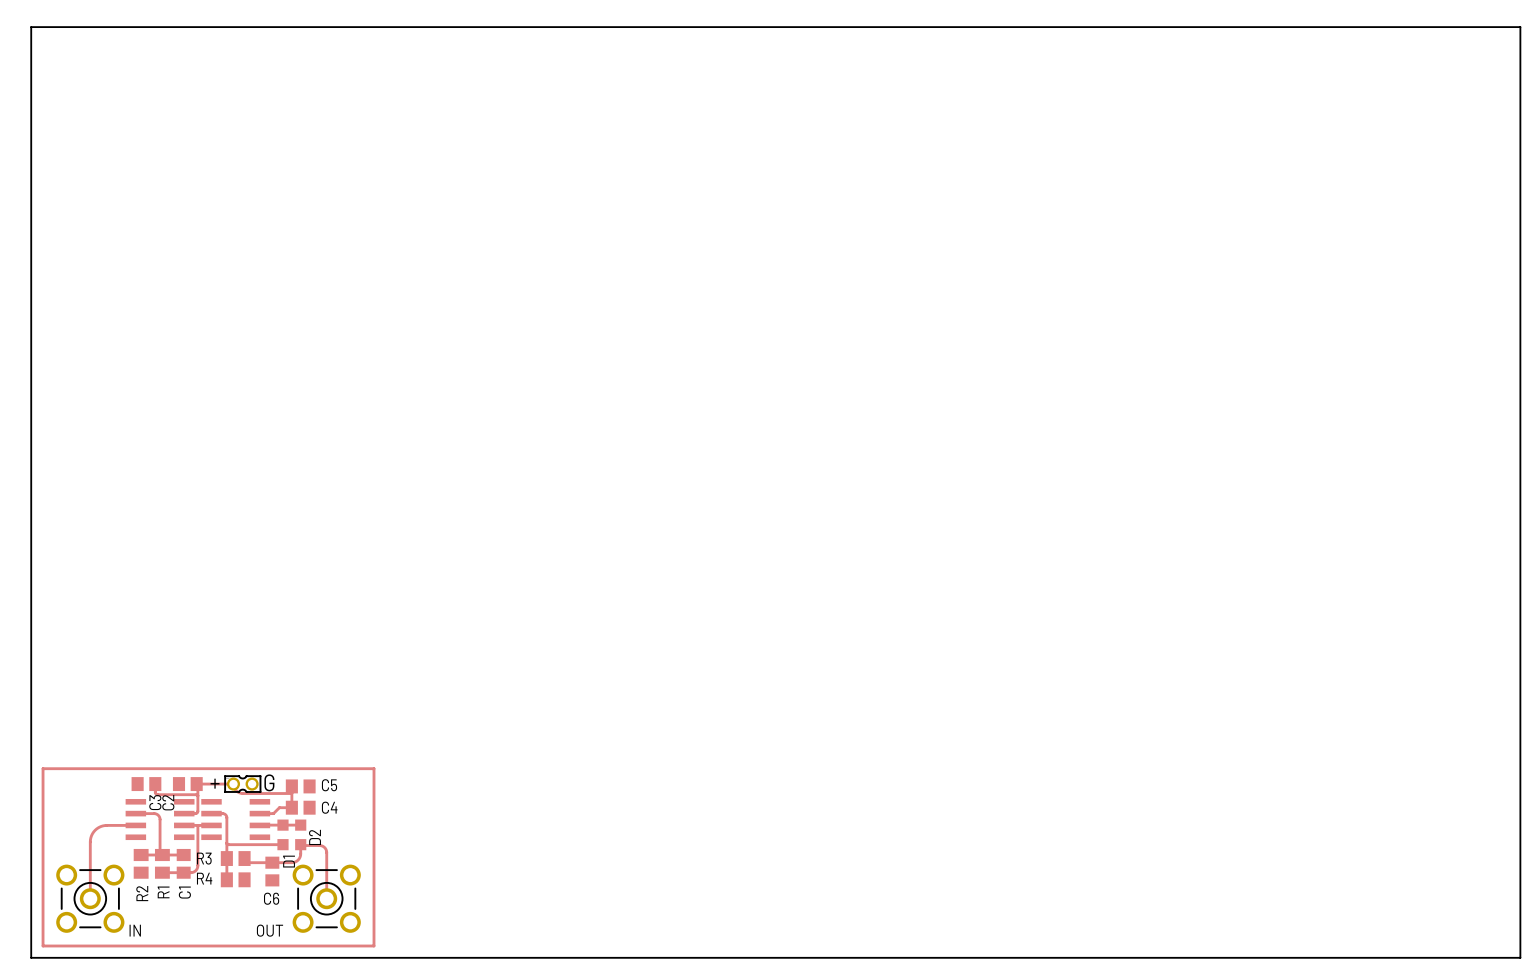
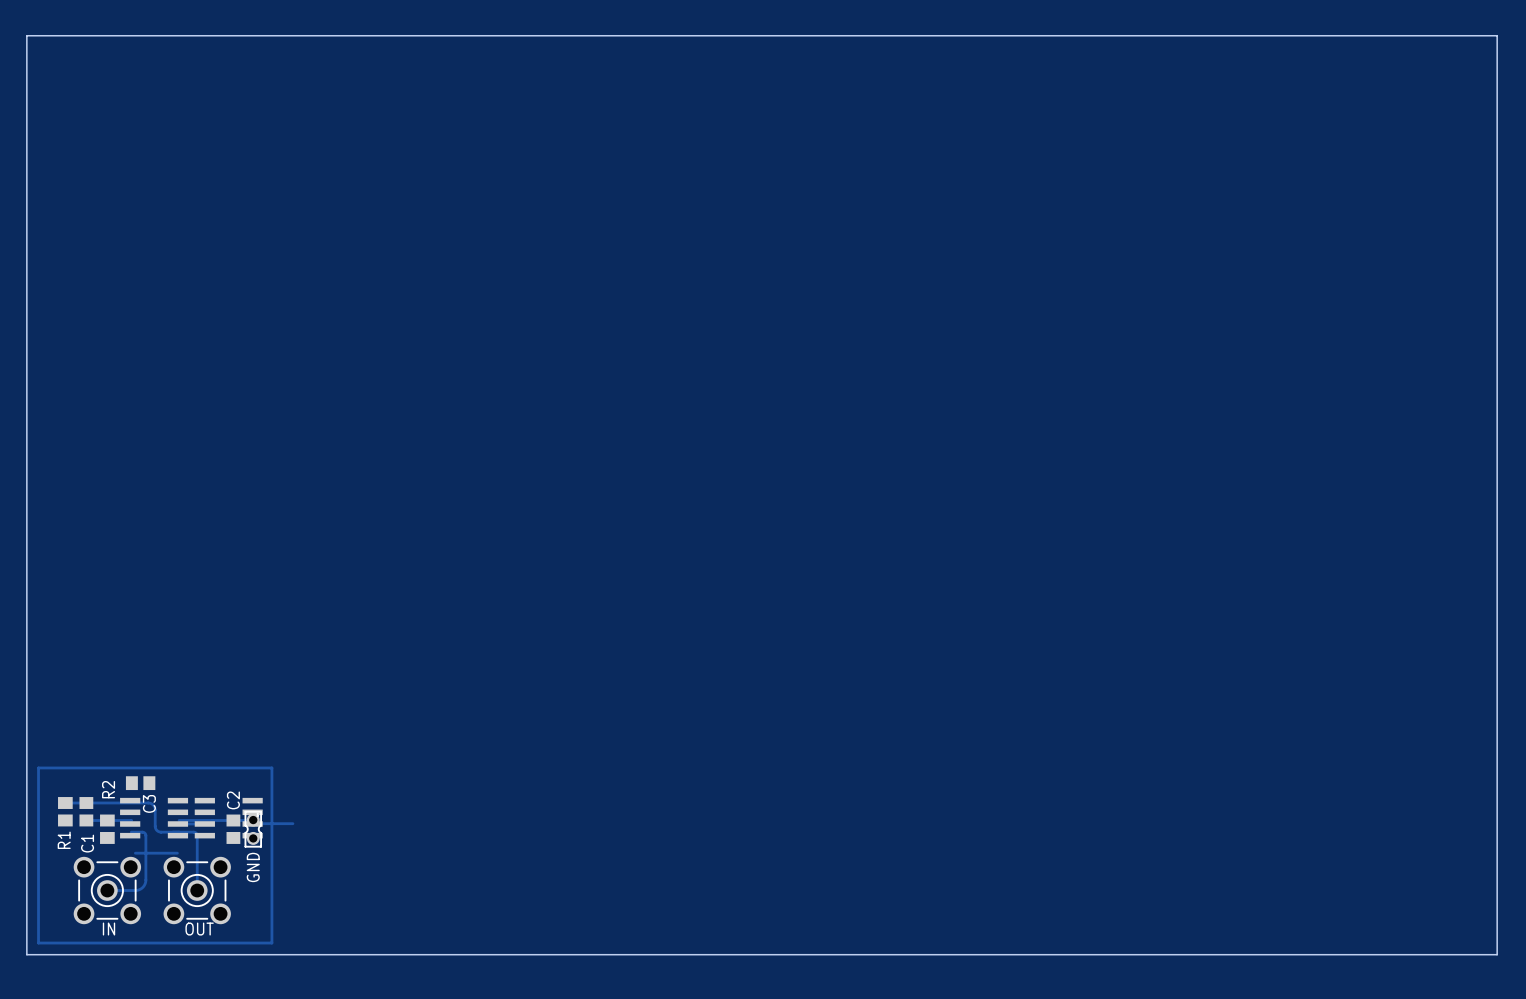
track: (279, 768) (374, 768) (374, 945) (279, 945) -> (271, 767) (271, 943)
text: G (269, 782) -> none
text: + (215, 783) -> none
track: (155, 784) (157, 794) (197, 795) -> none
C2 rotation: 0° (187, 784) -> 90° clockwise (233, 829)
C2 position: (187, 784) -> (233, 829)
part rotation: 0° (242, 784) -> 90° clockwise (253, 829)
part position: (242, 784) -> (253, 829)
track: (197, 785) (197, 812) (184, 813) -> none
track: (197, 785) (233, 784) (236, 790) (241, 793) (291, 793) -> none
track: (291, 786) (291, 807) (279, 807) (273, 813) (259, 813) -> none
C5: (300, 786) -> none
C2 name position: C2 (168, 802) -> C2 (233, 800)
track: none -> (65, 803) (150, 803) (154, 808) (155, 827) (158, 831) (195, 832) (197, 835) (197, 890)
C4: (300, 807) -> none
track: (135, 813) (154, 813) (159, 816) (160, 855) -> none
track: (211, 813) (223, 813) (226, 816) (226, 879) -> none
track: none -> (86, 820) (131, 820)
track: none -> (253, 820) (179, 820)
track: (135, 825) (104, 825) (96, 828) (92, 833) (90, 841) (90, 898) -> none
track: (197, 825) (196, 869) (191, 872) (162, 872) -> none
track: none -> (131, 832) (142, 832) (145, 834) (145, 884) (136, 890) (107, 890)
D1: (282, 834) -> none
D2: (300, 834) -> none
track: (226, 843) (282, 844) -> none
track: (301, 845) (320, 845) (326, 849) (326, 898) -> none
track: (301, 845) (300, 857) (294, 862) (248, 862) (244, 858) -> none
R3: (235, 858) -> none
R2 position: (141, 863) -> (107, 829)
R1 position: (162, 863) -> (65, 811)
C1 position: (183, 863) -> (86, 811)
text: none -> GND (253, 867)
C6: (272, 871) -> none
R4: (235, 879) -> none
R1 name position: R1 (163, 892) -> R1 (64, 840)
R2 name position: R2 (142, 893) -> R2 (108, 789)
IN position: (90, 898) -> (107, 890)
OUT position: (326, 898) -> (197, 890)
IN name position: IN (135, 930) -> IN (108, 929)
OUT name position: OUT (269, 930) -> OUT (199, 929)

